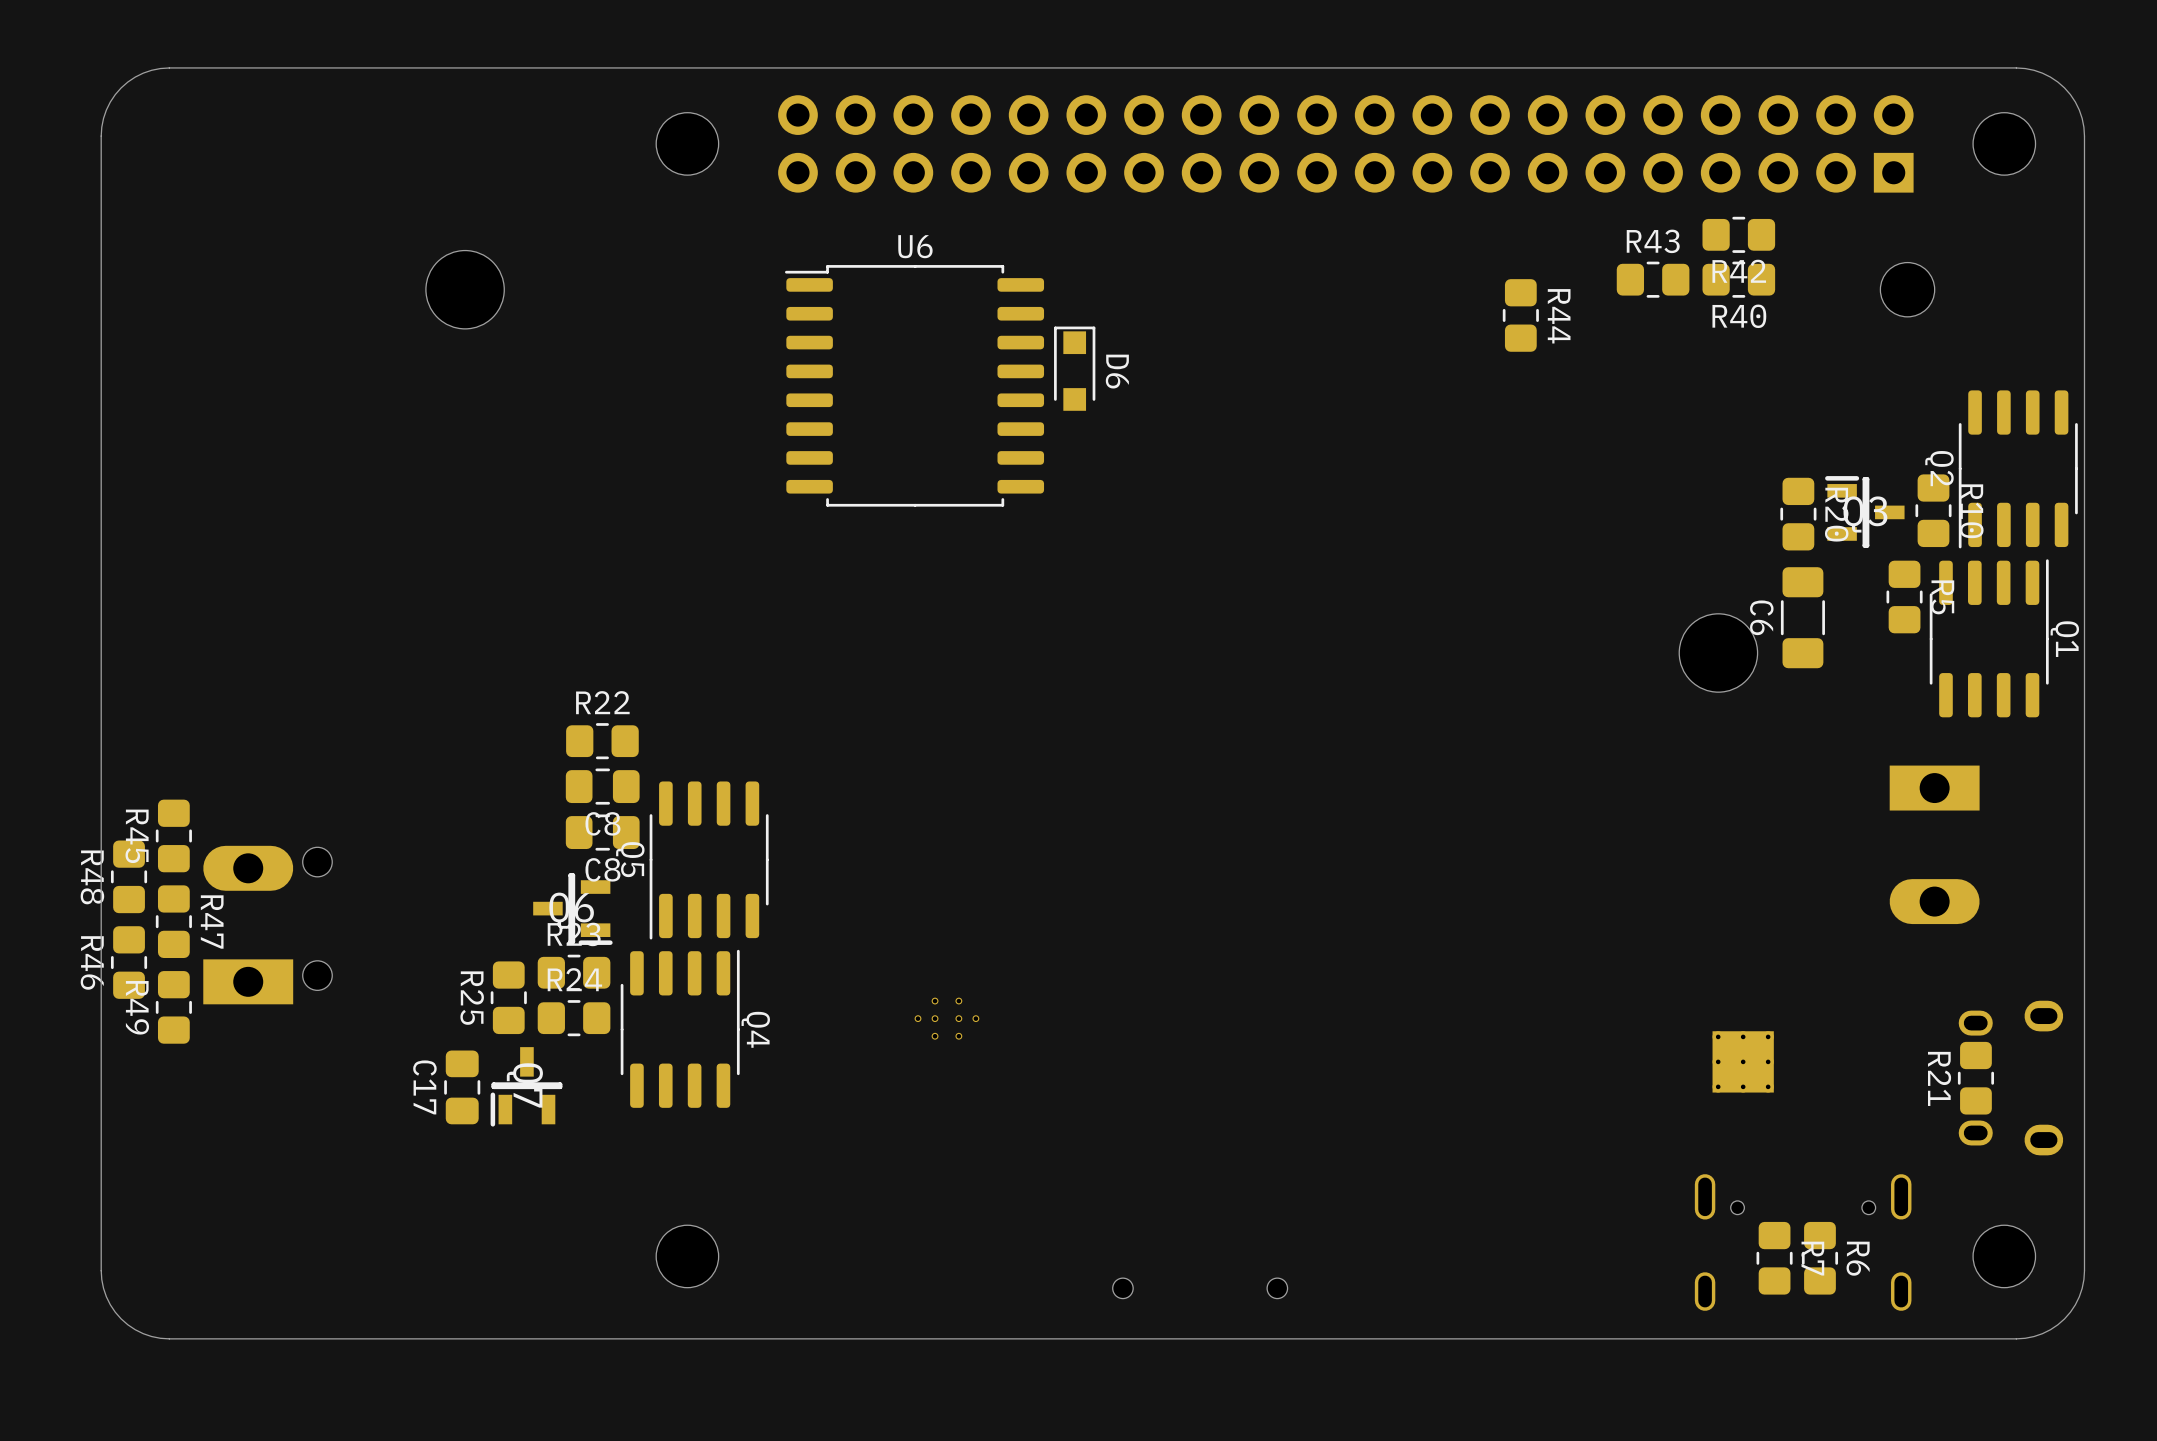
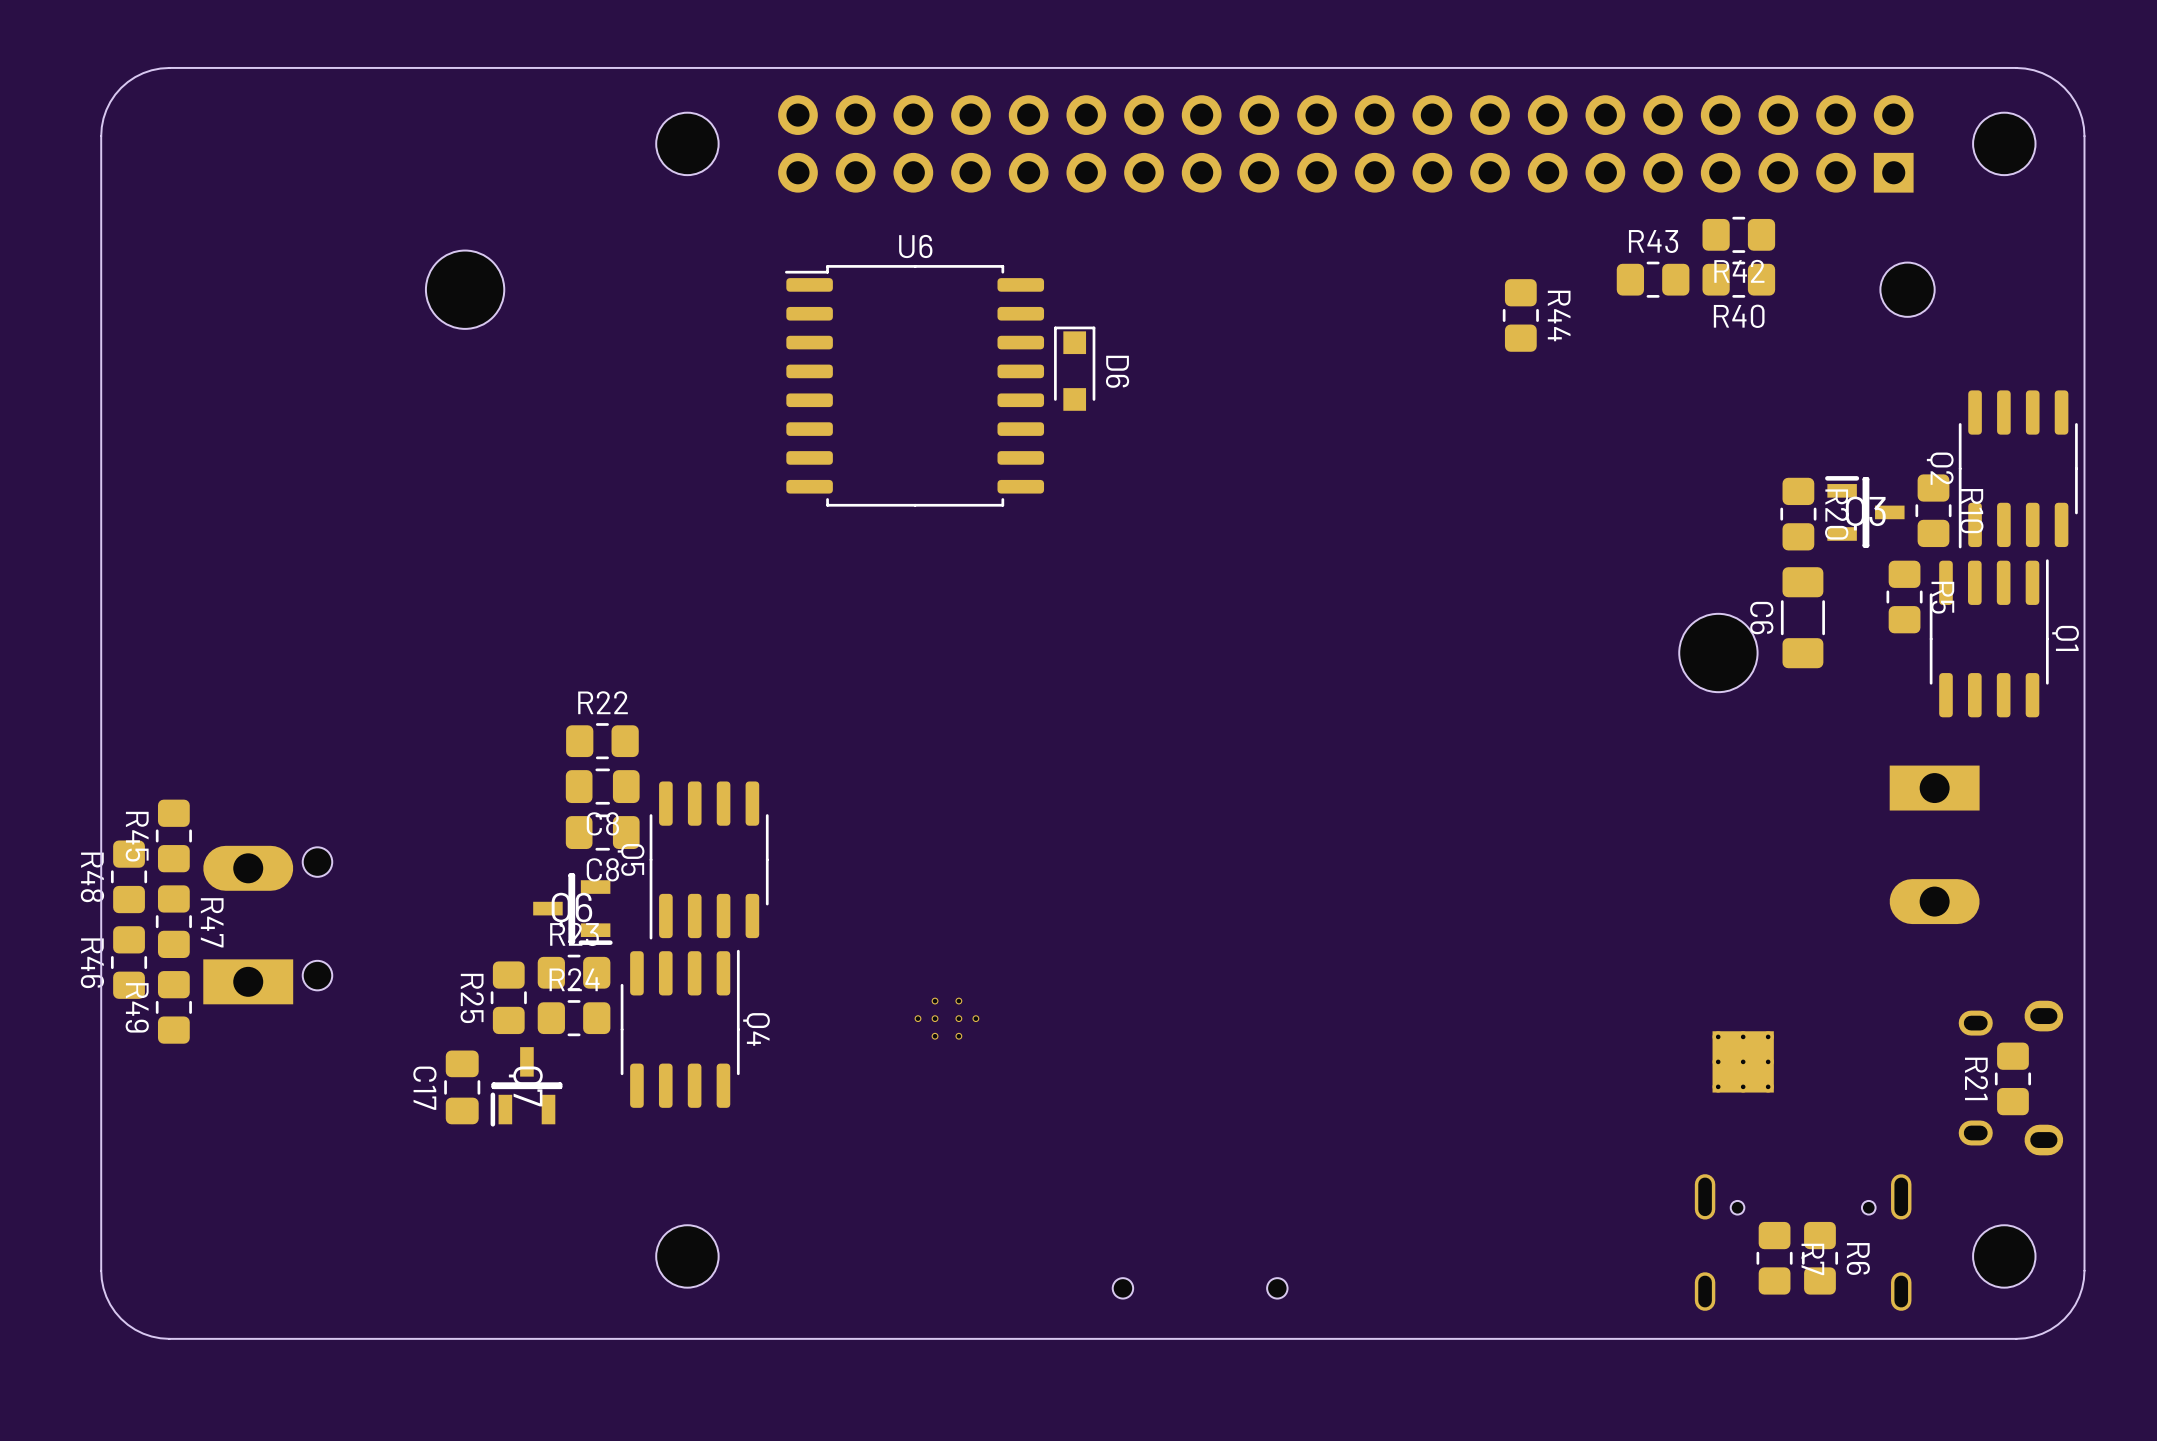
R21 position: (1975, 1078) -> (2012, 1078)

